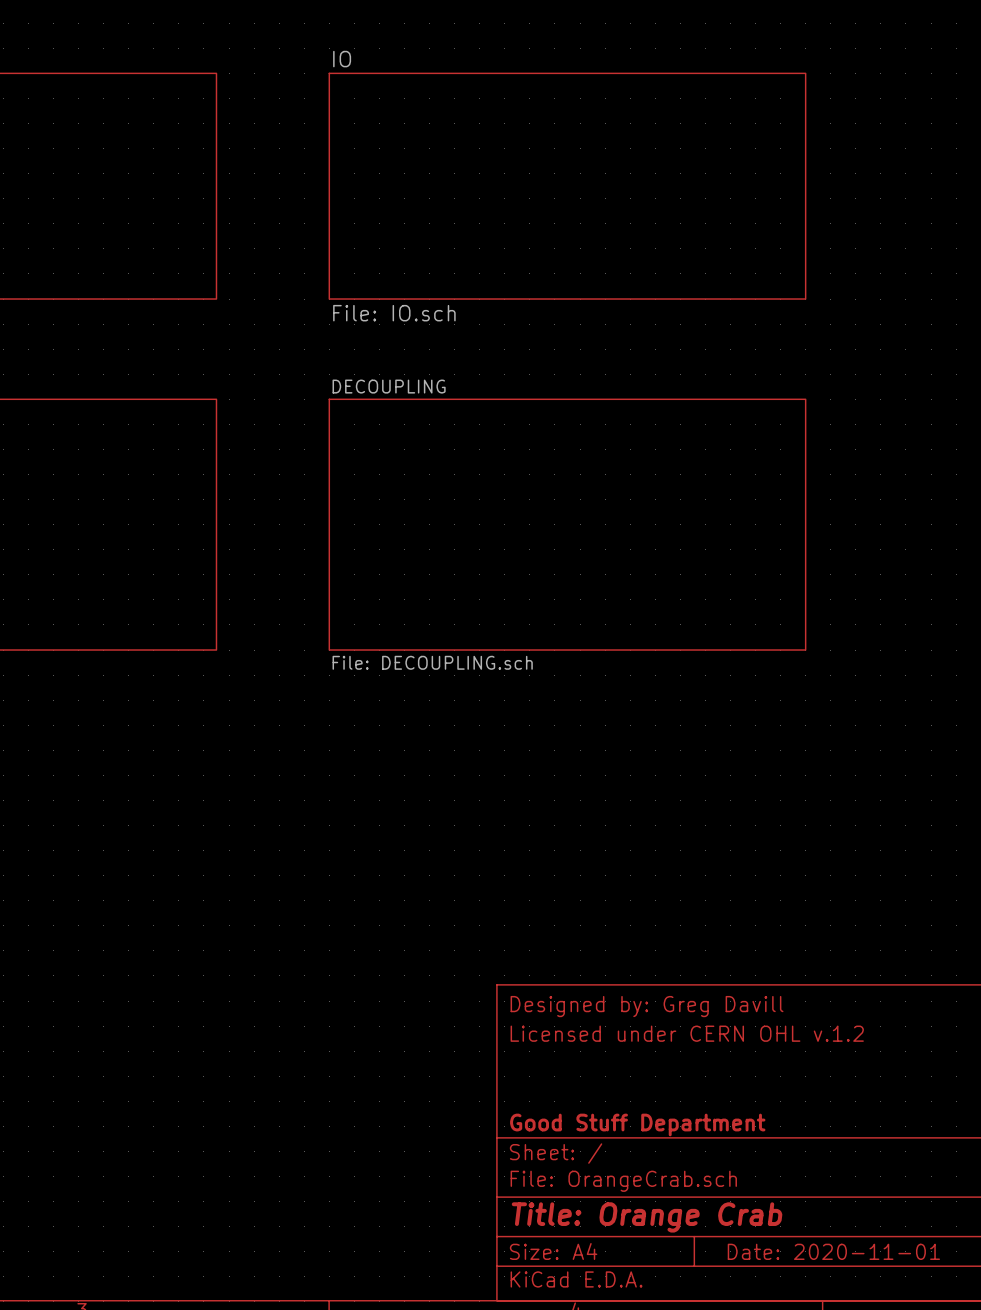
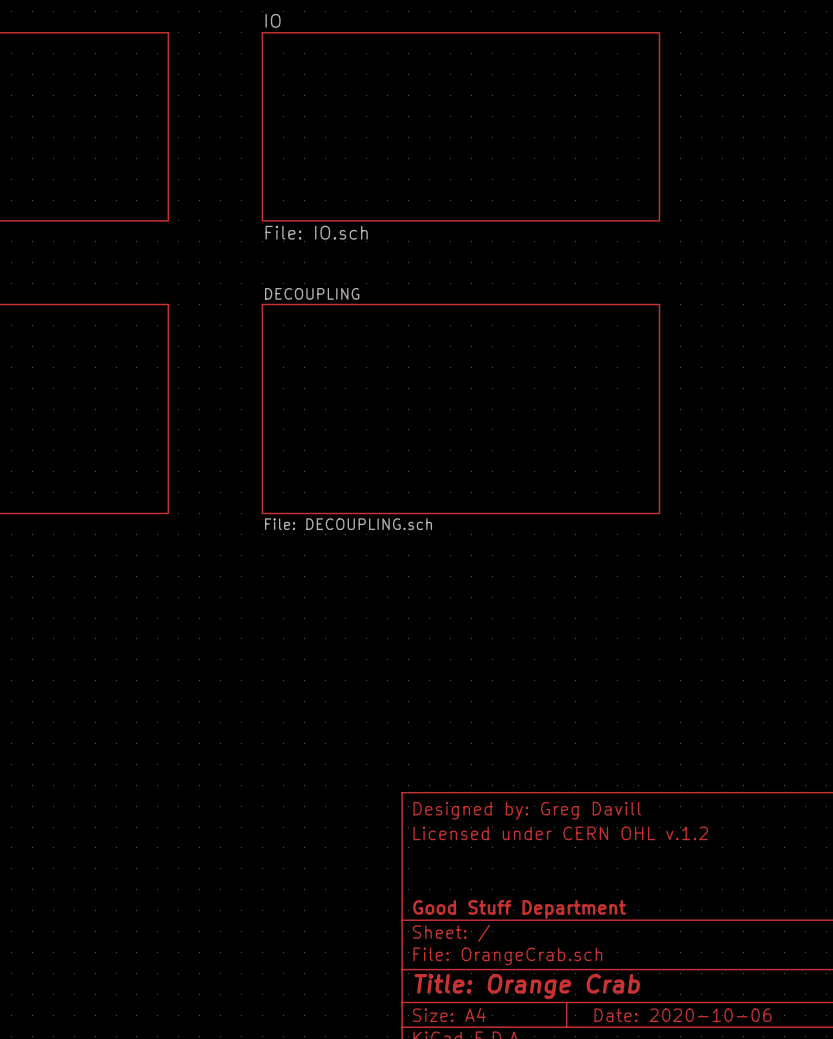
title block: Date: 2020-11-01 (833, 1251) -> Date: 2020-10-06 (682, 1015)

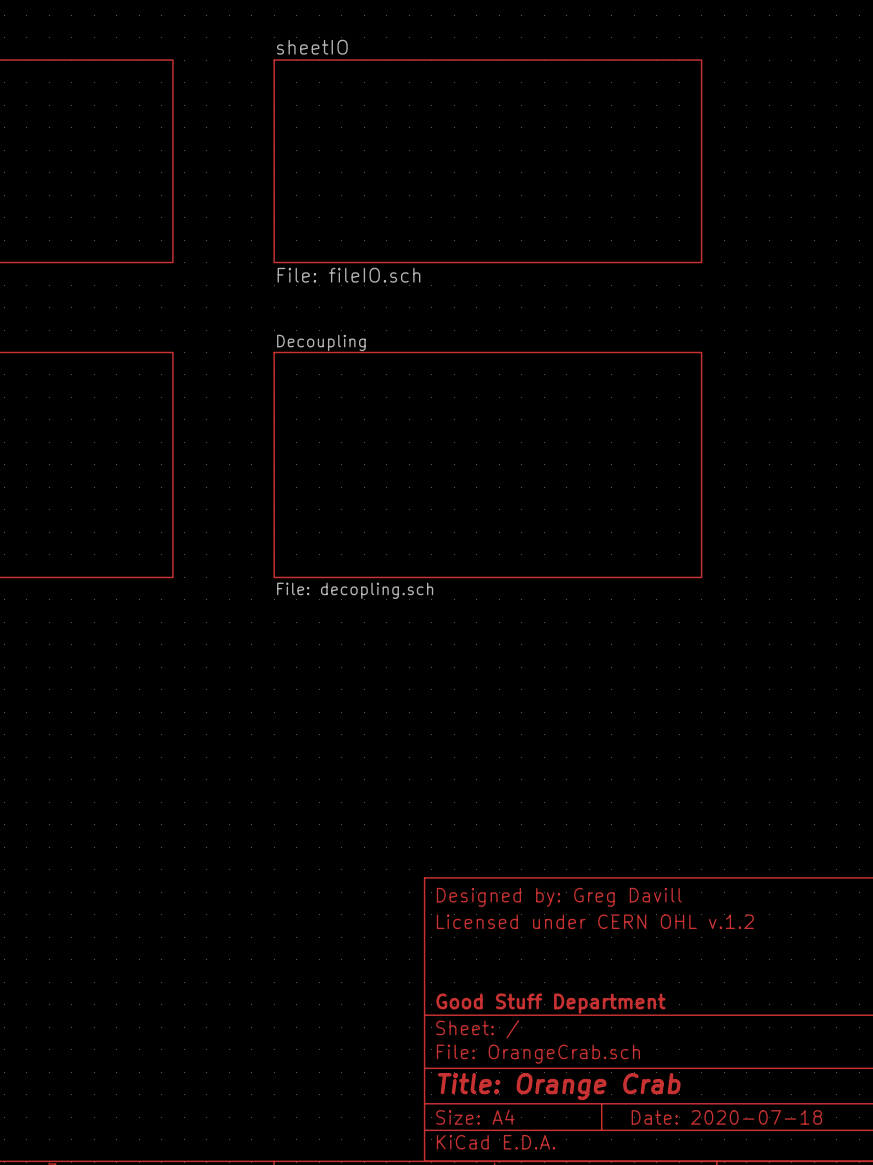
sheet IO name: IO (273, 20) -> sheetIO (312, 47)
sheet IO value: File: IO.sch (316, 232) -> File: fileIO.sch (348, 275)
sheet DECOUPLING name: DECOUPLING (312, 293) -> Decoupling (321, 342)
sheet DECOUPLING value: File: DECOUPLING.sch (348, 524) -> File: decopling.sch (355, 590)
title block: Date: 2020-10-06 (682, 1015) -> Date: 2020-07-18 (726, 1117)

